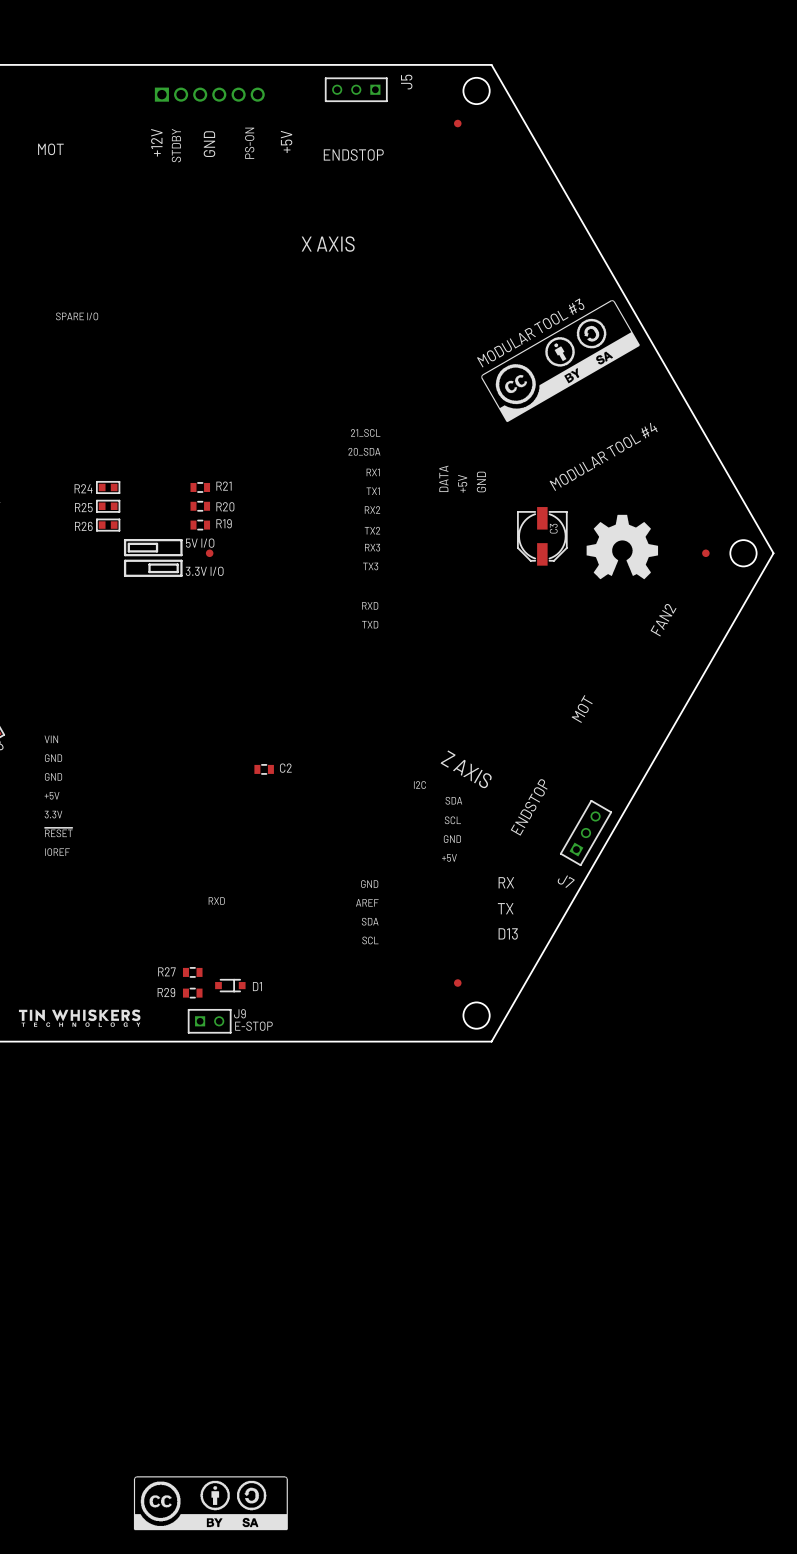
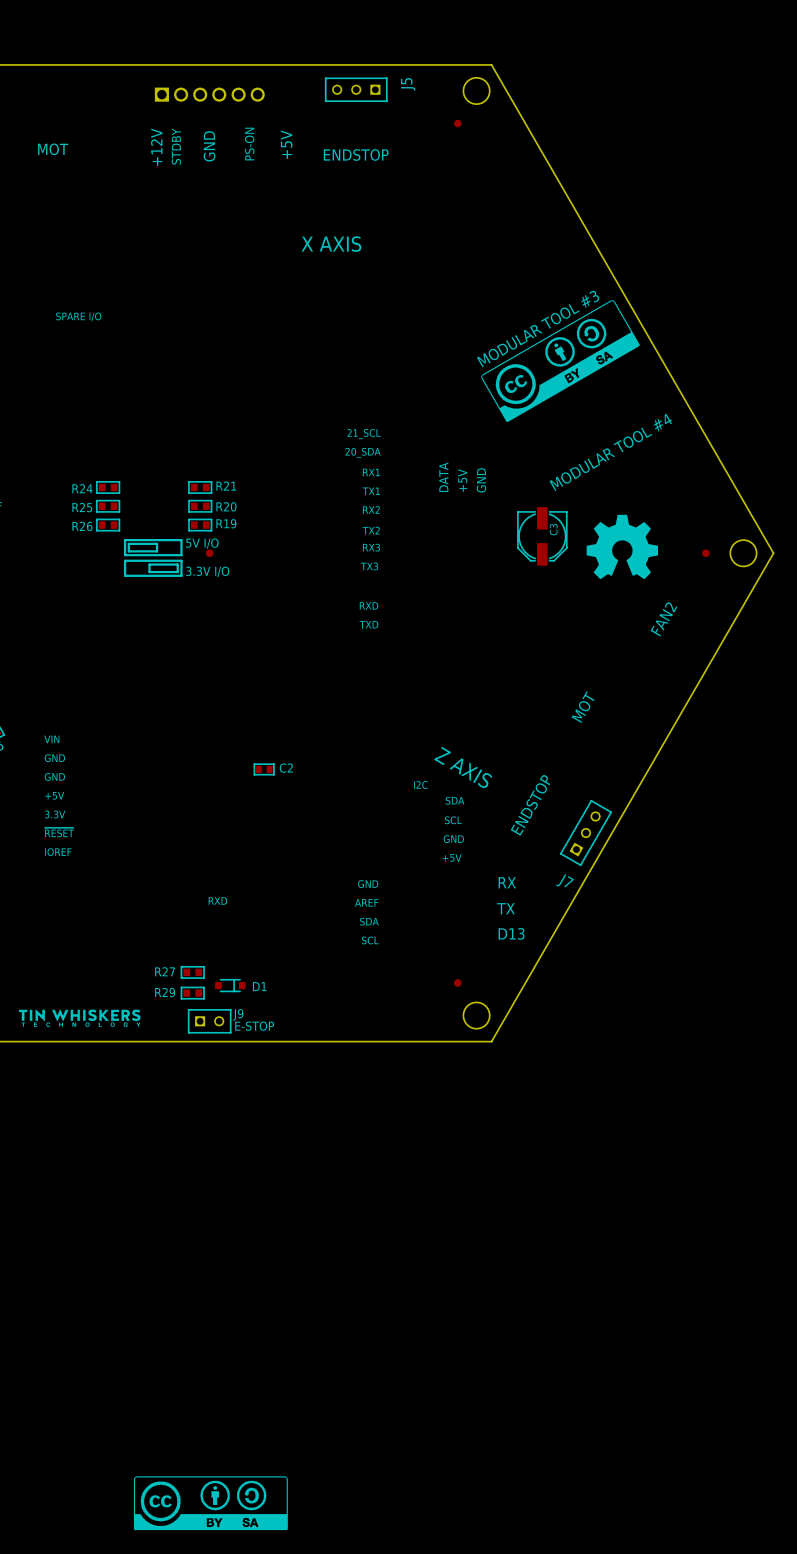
R21 footprint: [190, 482, 211, 493] -> [188, 481, 212, 494]
R20 footprint: [190, 501, 211, 512] -> [188, 500, 212, 513]
R19 footprint: [190, 519, 211, 531] -> [188, 519, 212, 532]
C2 footprint: [254, 764, 274, 775] -> [254, 763, 275, 776]
R27 footprint: [182, 967, 203, 978] -> [181, 966, 205, 979]
R29 footprint: [182, 988, 203, 999] -> [181, 987, 205, 1000]

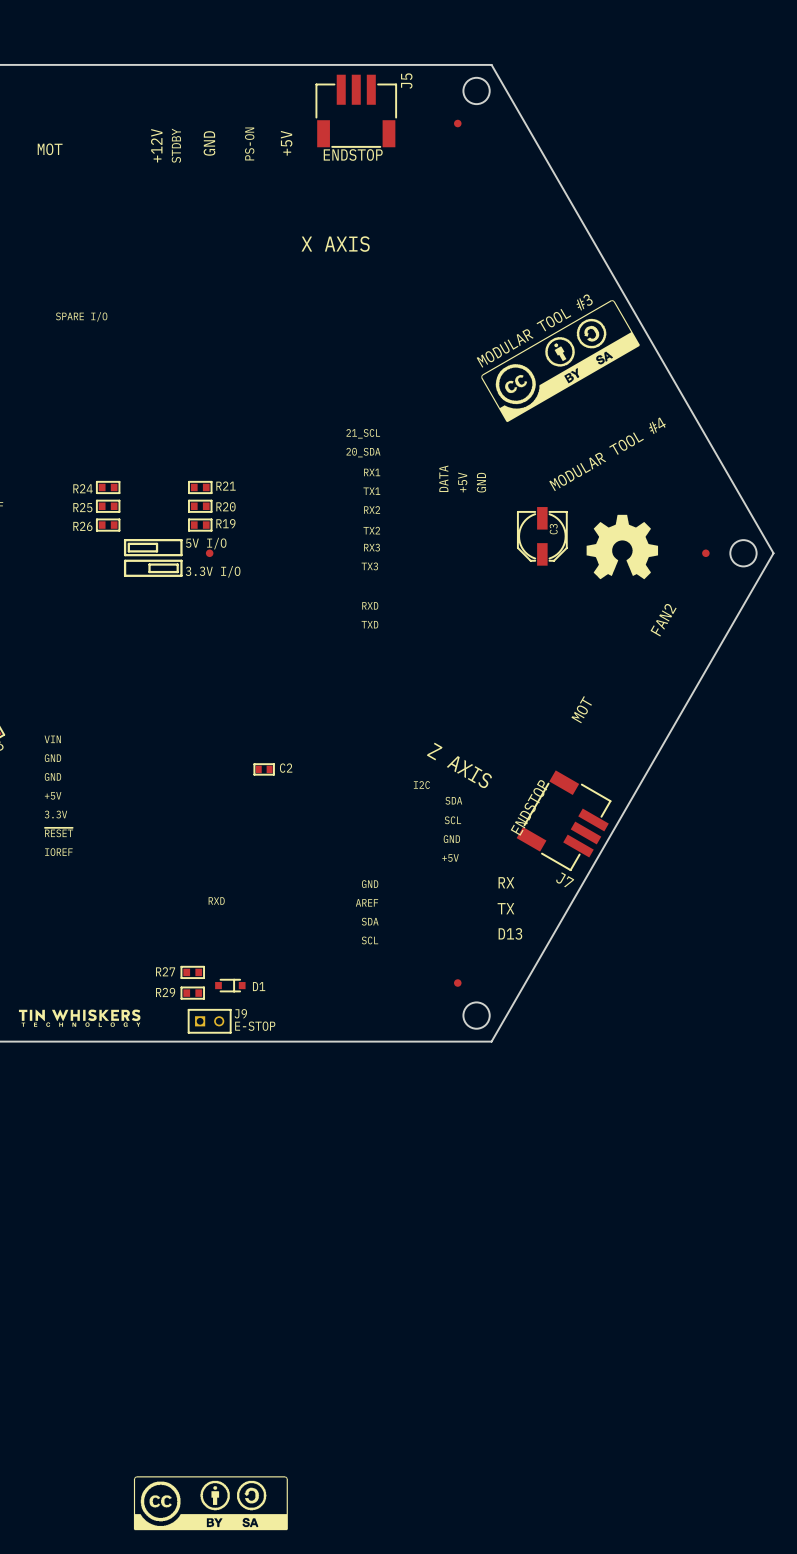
J5 footprint: [325, 77, 388, 102] -> [315, 74, 397, 148]
part: (209, 94) -> none
J7 footprint: [560, 800, 612, 866] -> [516, 770, 611, 871]

